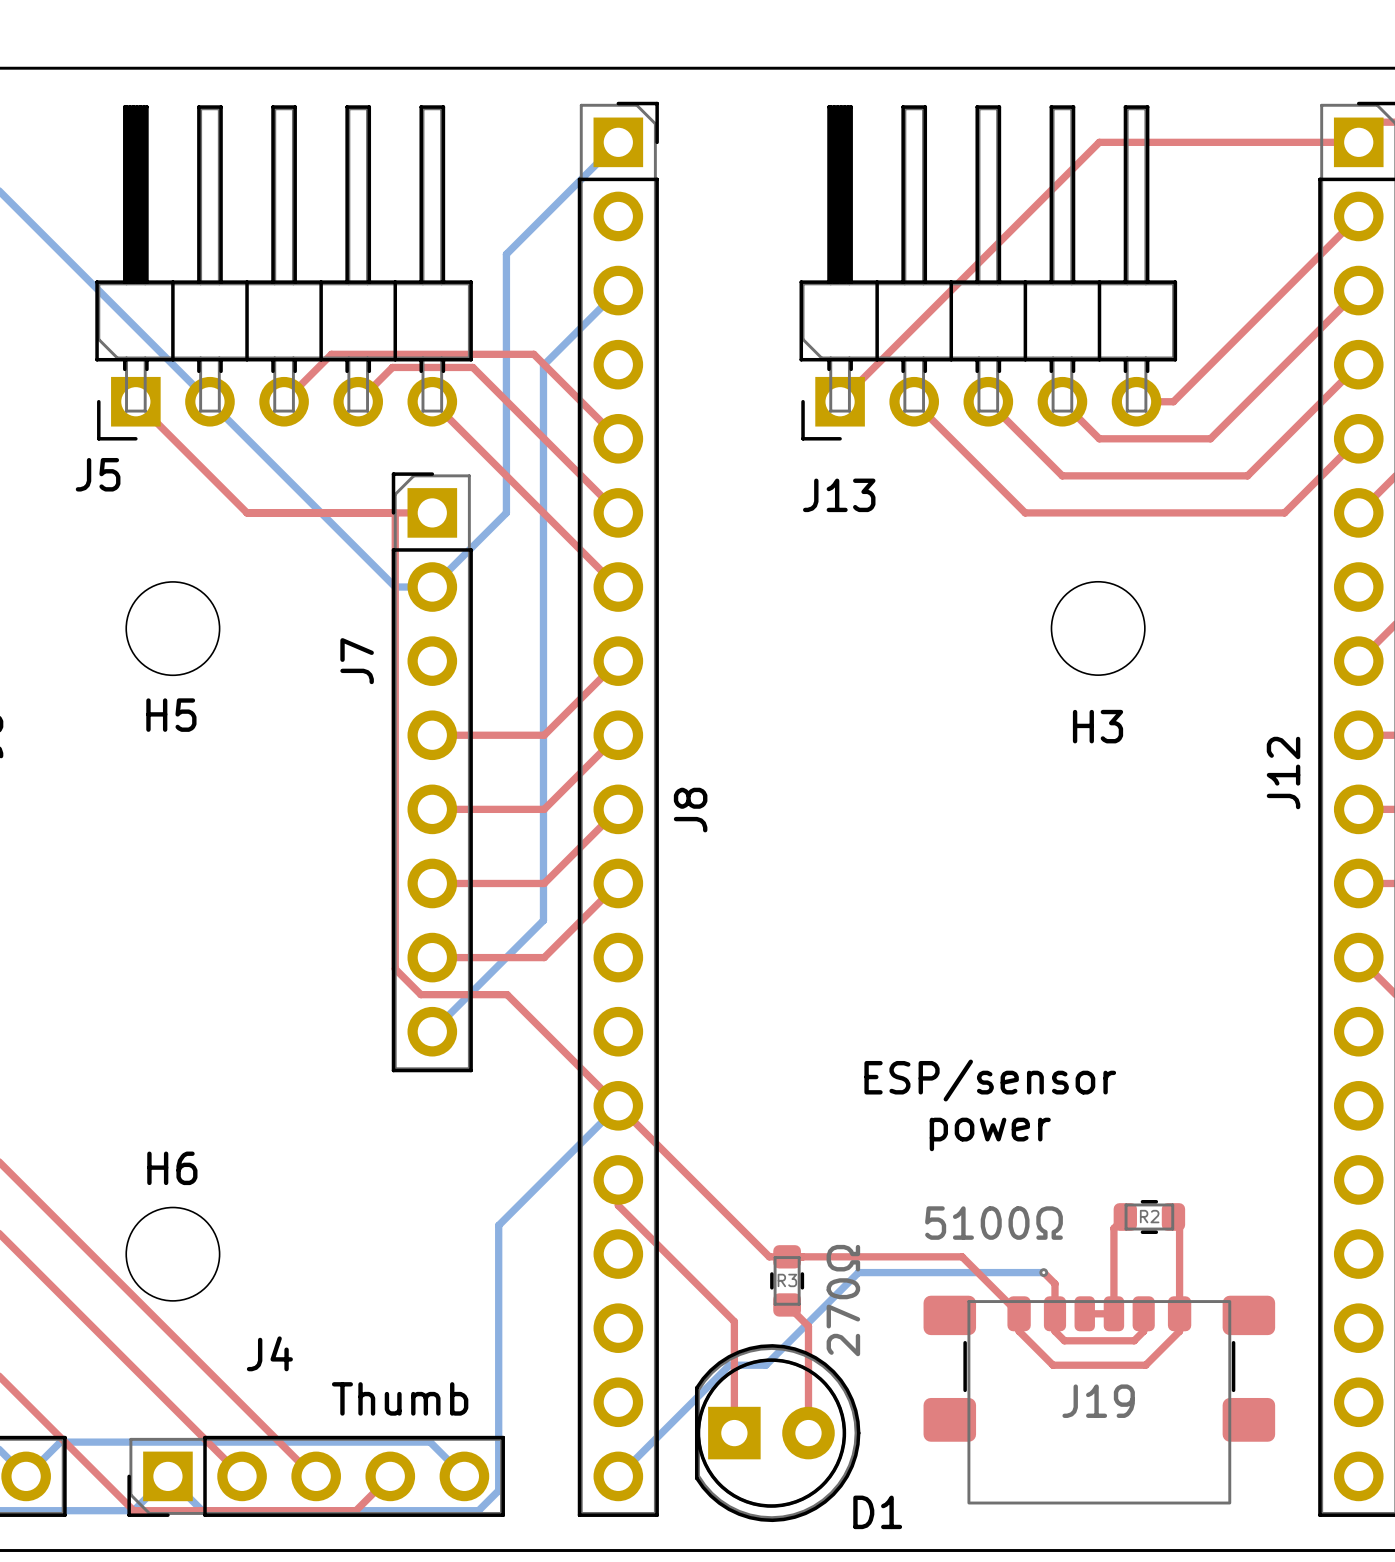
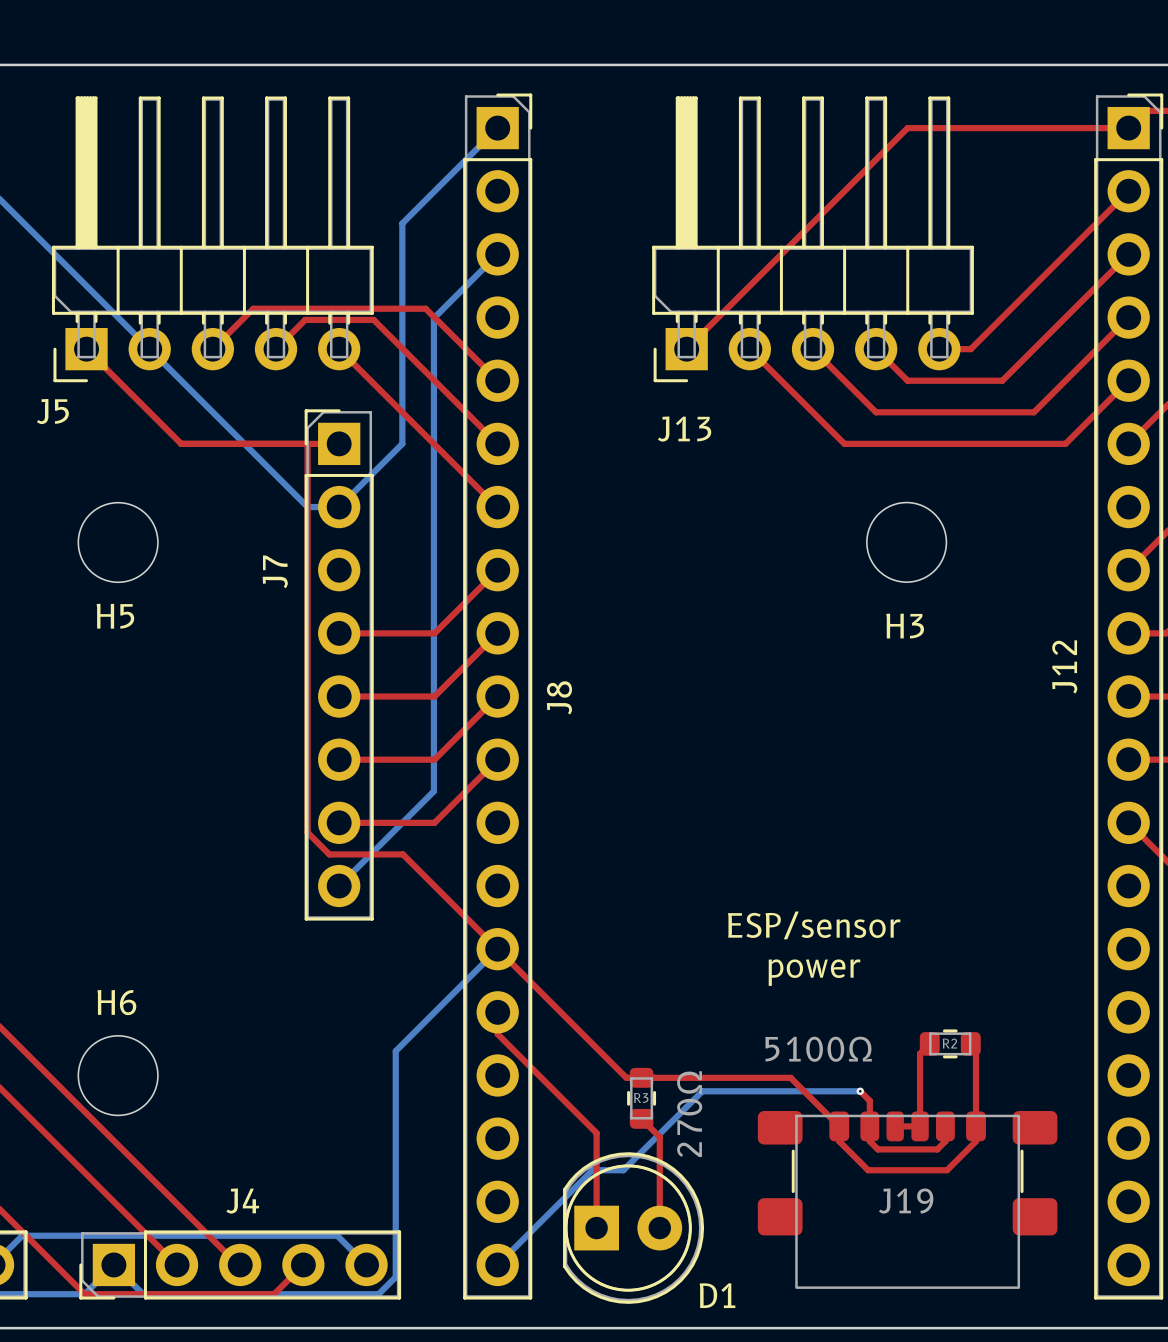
J4 name position: J4 (269, 1353) -> J4 (242, 1201)
text: Thumb (400, 1398) -> none

